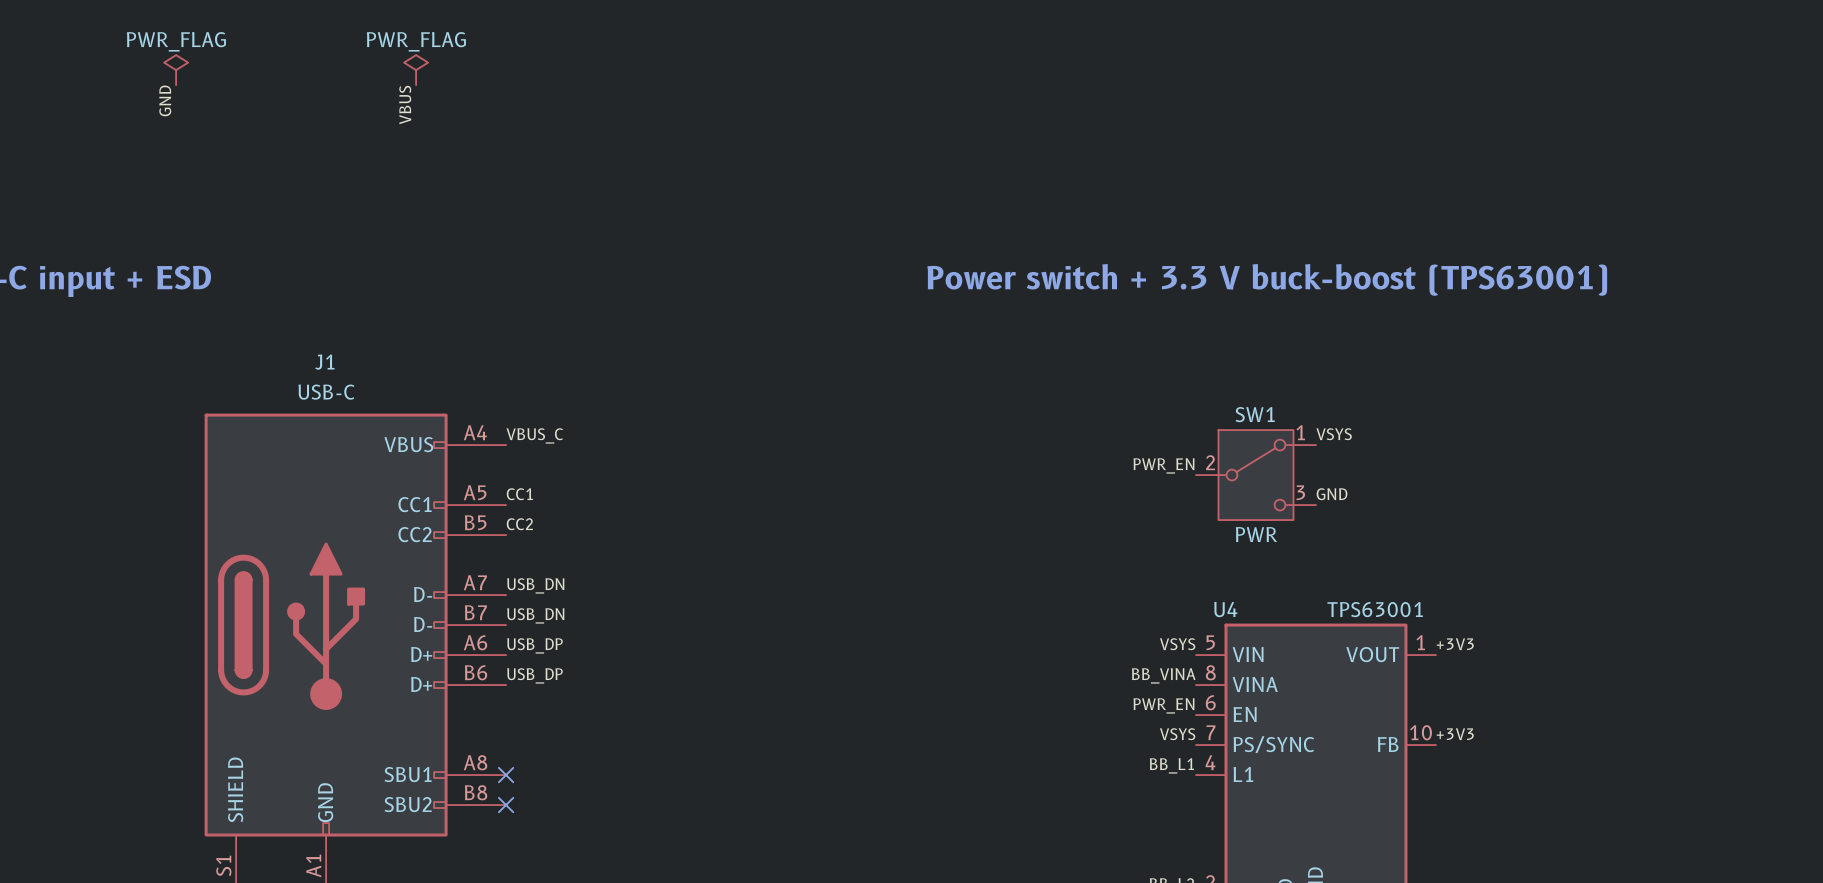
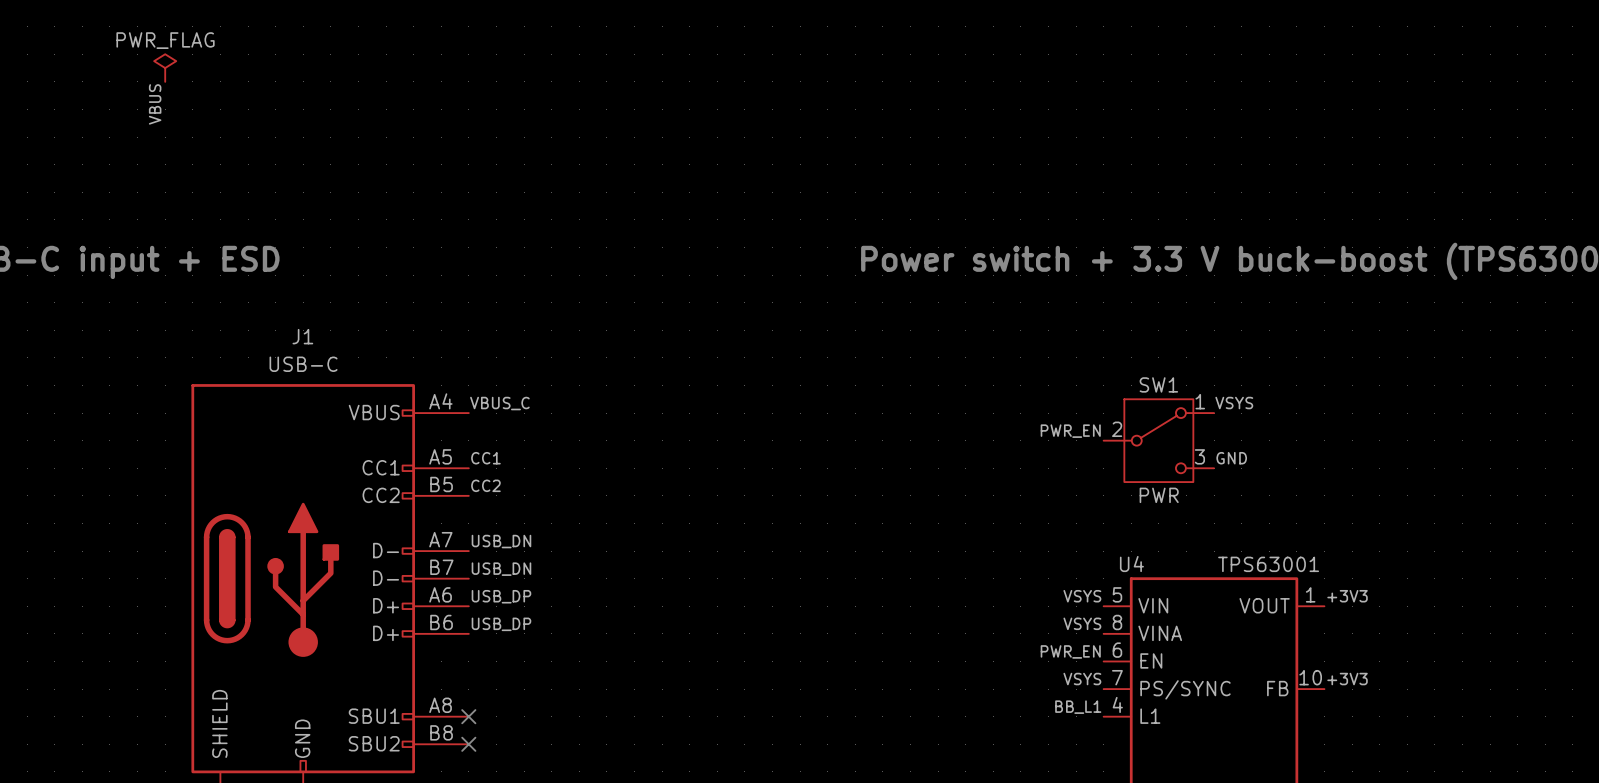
power symbol: PWR_FLAG (416, 70) -> none
label: GND (165, 100) -> VBUS (155, 104)
label: VBUS (405, 105) -> none
label: BB_VINA (1163, 675) -> VSYS (1082, 623)

